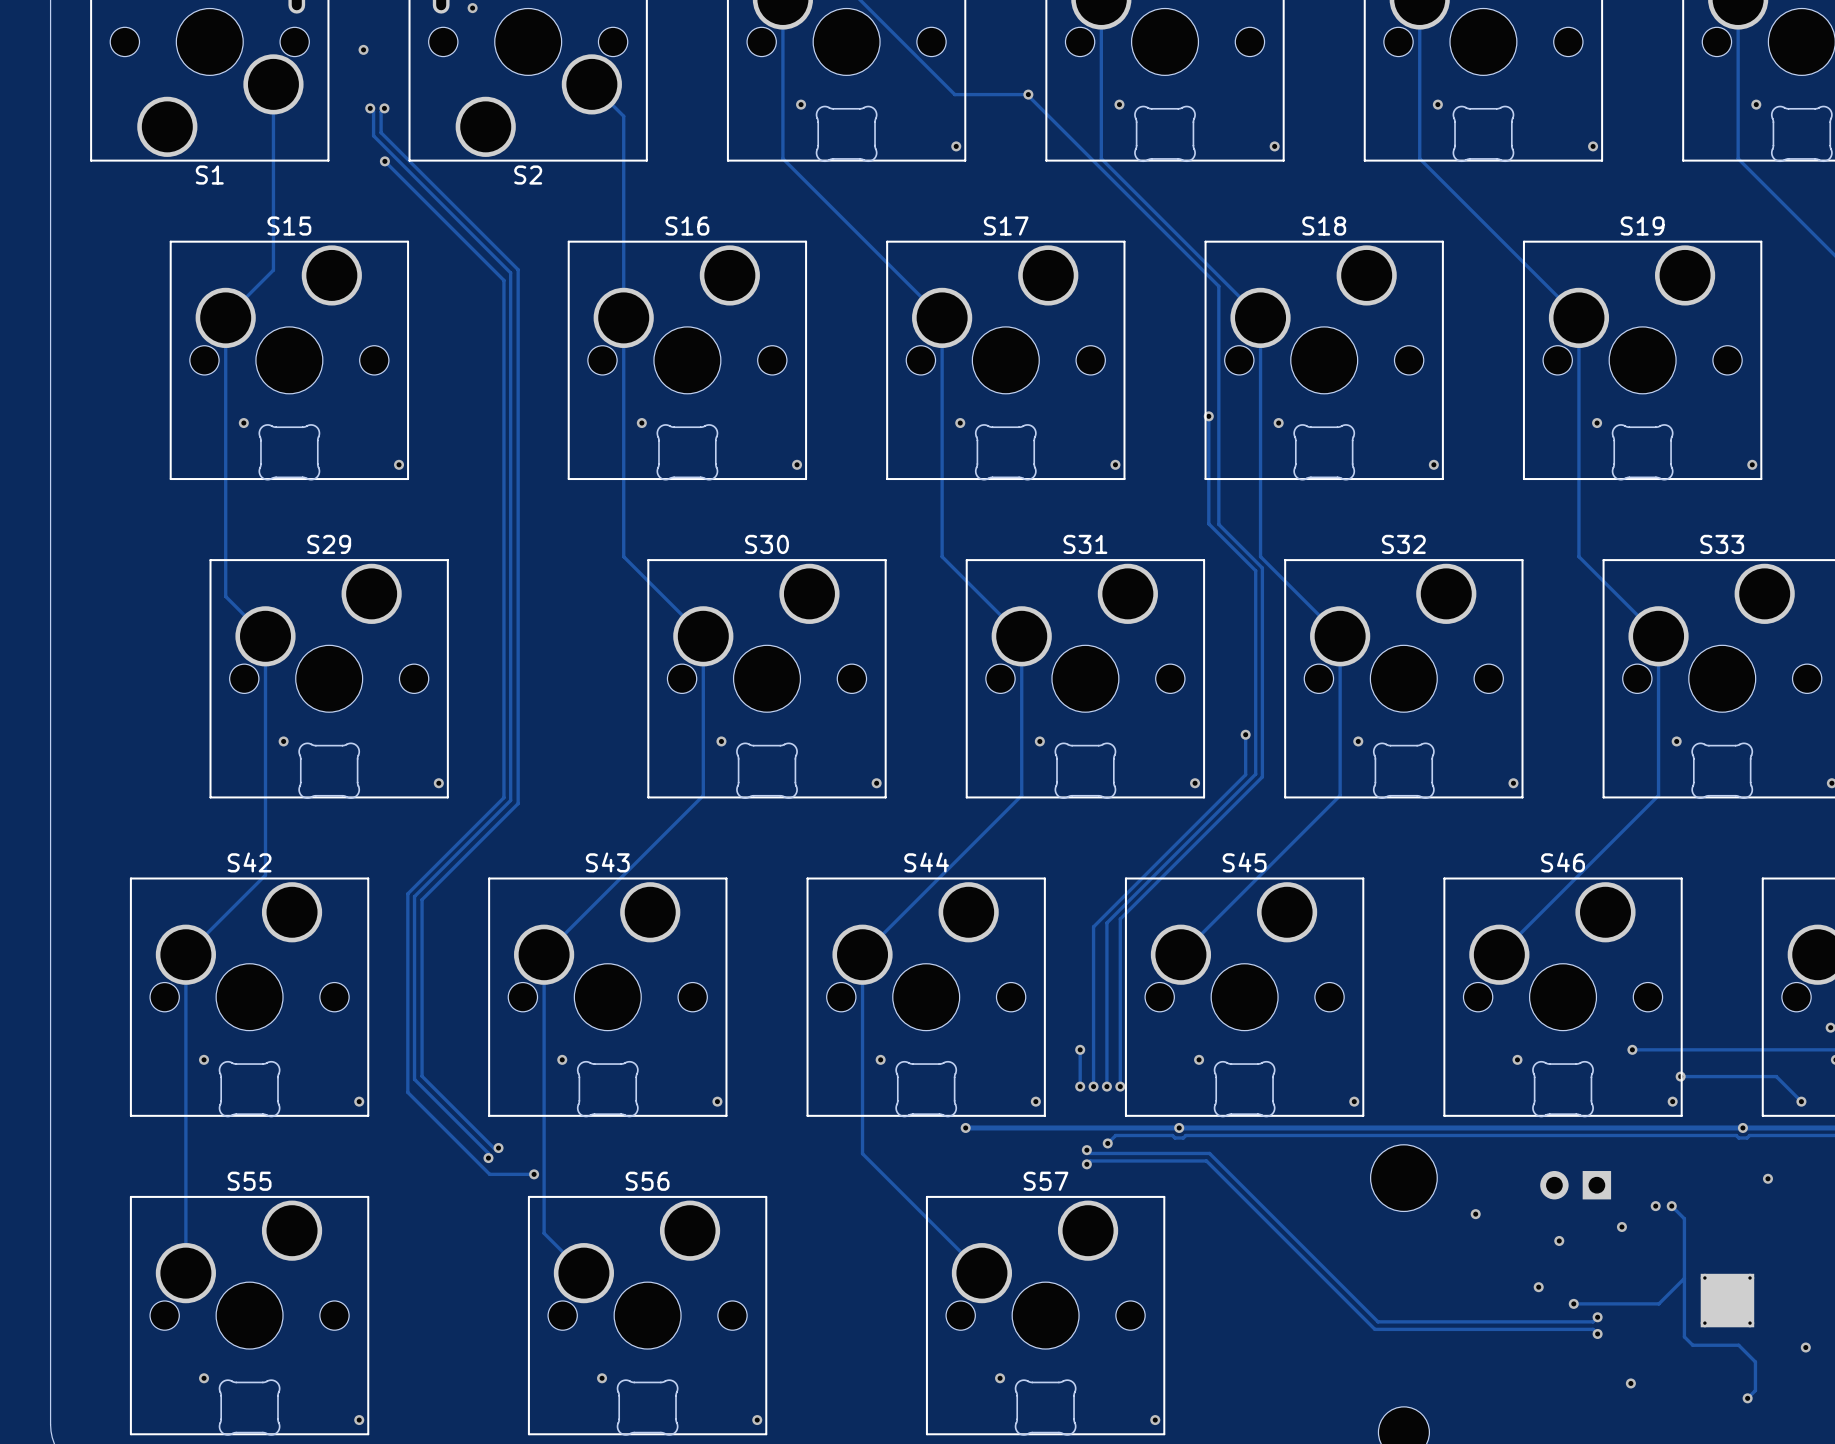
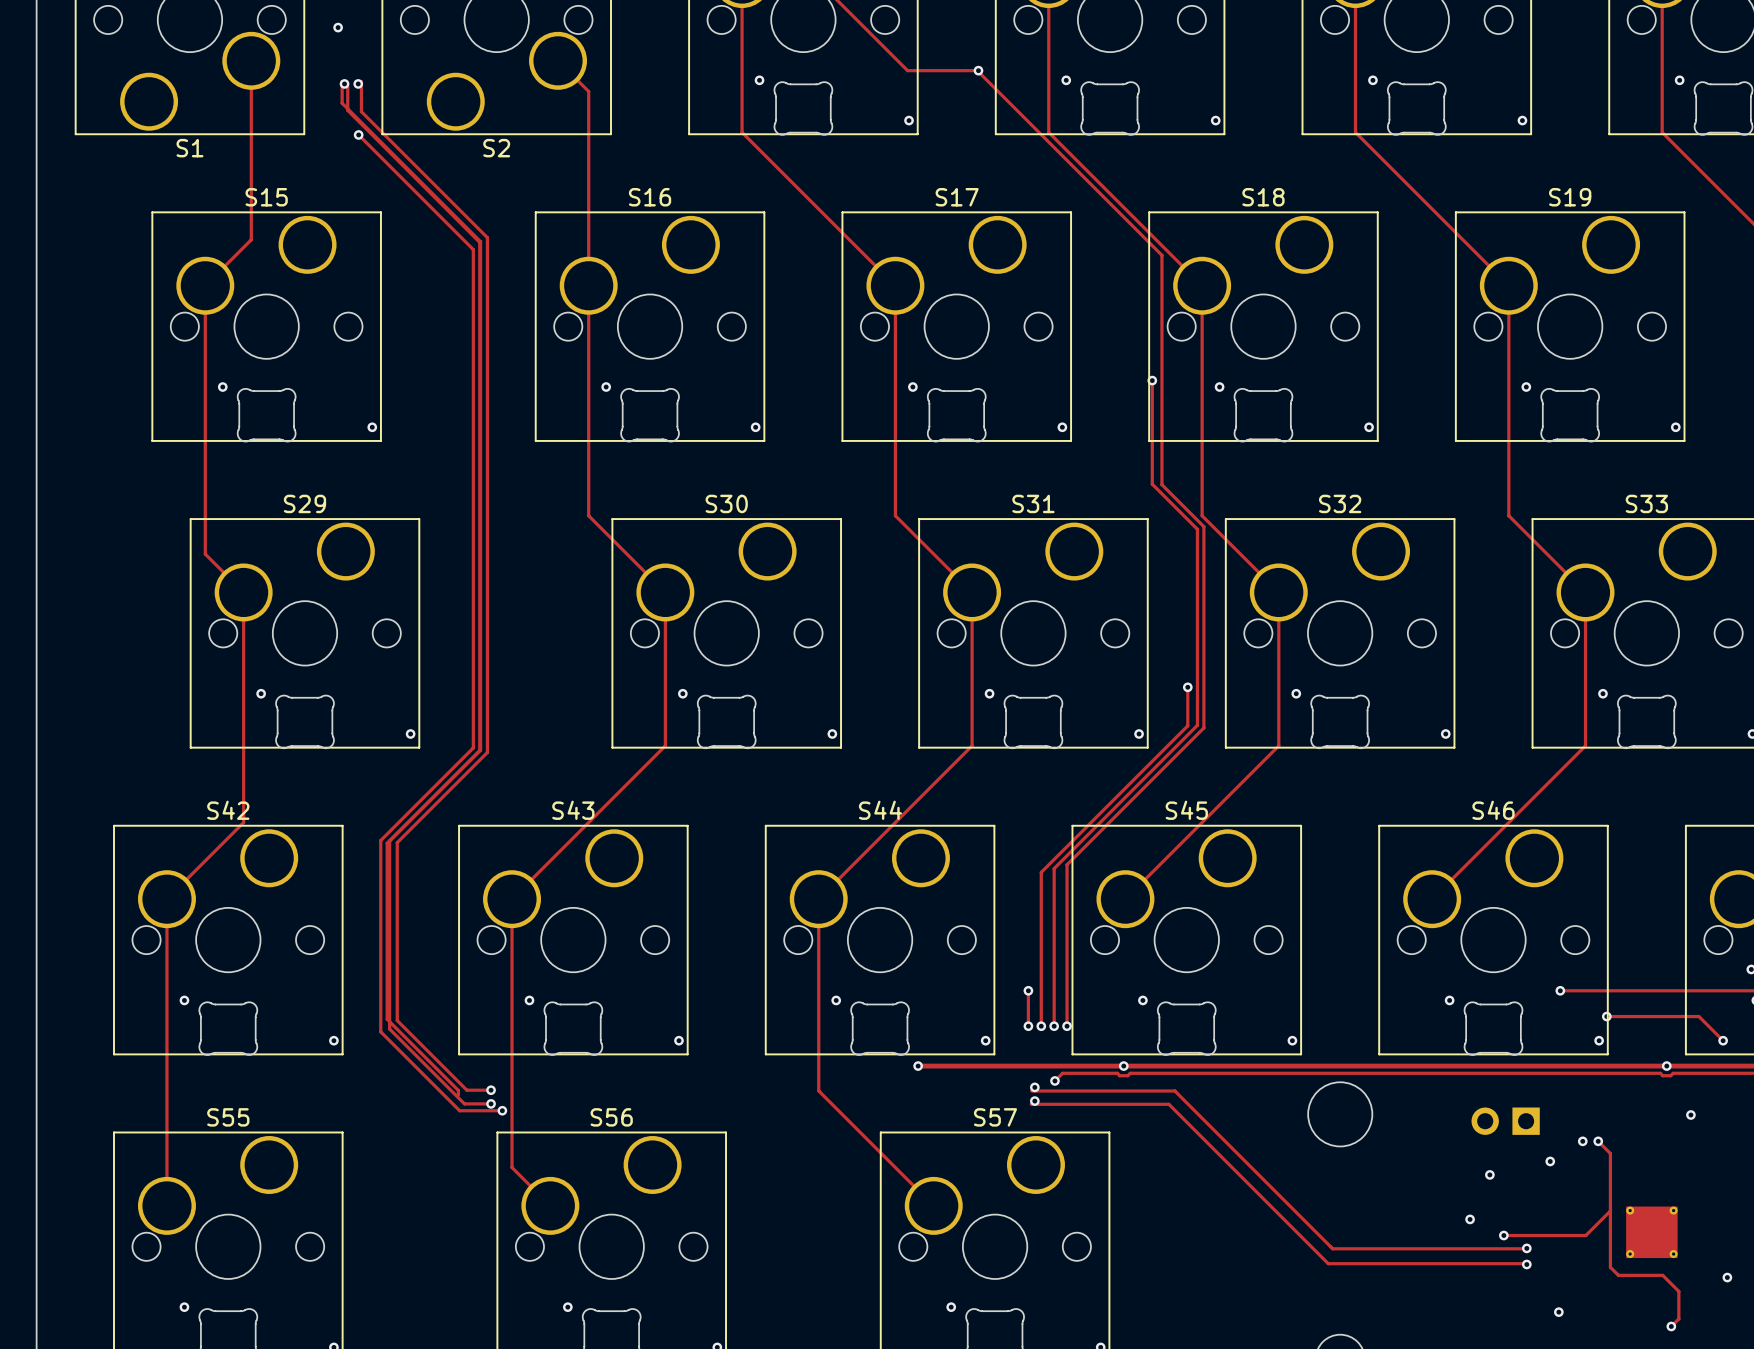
track: none -> (342, 81) (342, 103) (480, 241) (480, 750) (389, 841) (389, 1029) (464, 1103) (491, 1103)
track: none -> (361, 81) (361, 111) (487, 237) (487, 752) (397, 842) (397, 1020) (466, 1090) (491, 1090)
track: (384, 108) (381, 111) (381, 132) (518, 269) (518, 803) (422, 899) (422, 1076) (493, 1148) (498, 1148) -> none
via: (498, 1148) -> none
track: (1086, 1150) (1090, 1153) (1209, 1153) (1378, 1321) (1593, 1321) (1597, 1317) -> none
via: none -> (491, 1090)
track: none -> (1031, 1091) (1174, 1091) (1332, 1248) (1523, 1248)
via: (488, 1158) -> none
track: (1086, 1164) (1090, 1160) (1206, 1160) (1374, 1329) (1593, 1329) (1597, 1333) -> none
via: none -> (491, 1103)
track: none -> (1031, 1104) (1168, 1104) (1328, 1263) (1523, 1263)
via: (1475, 1214) -> none

